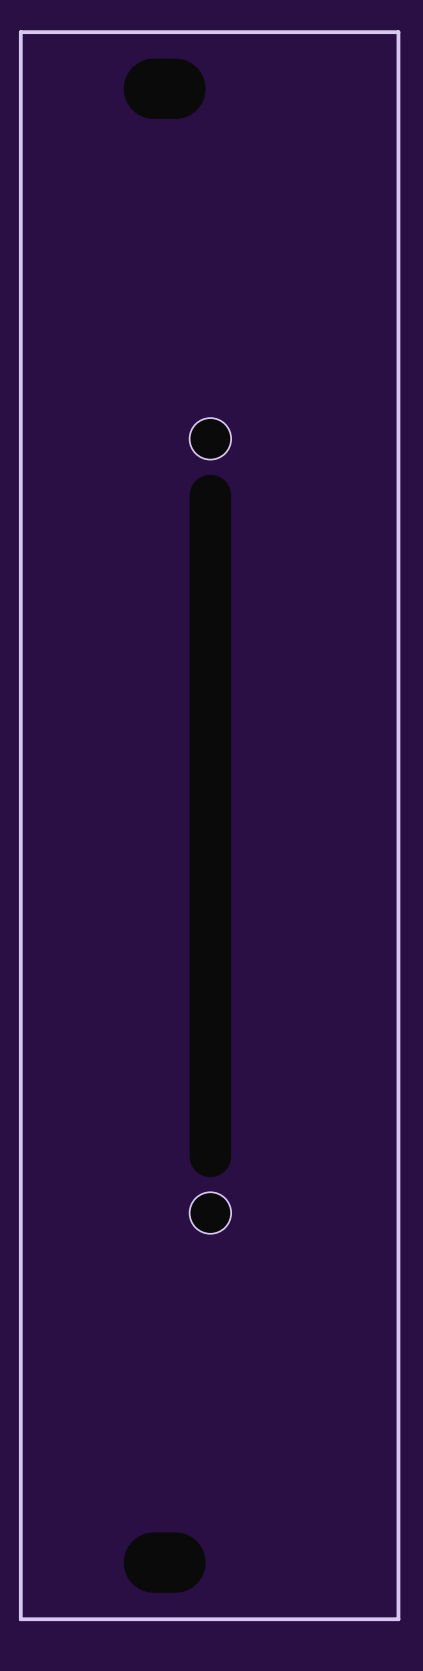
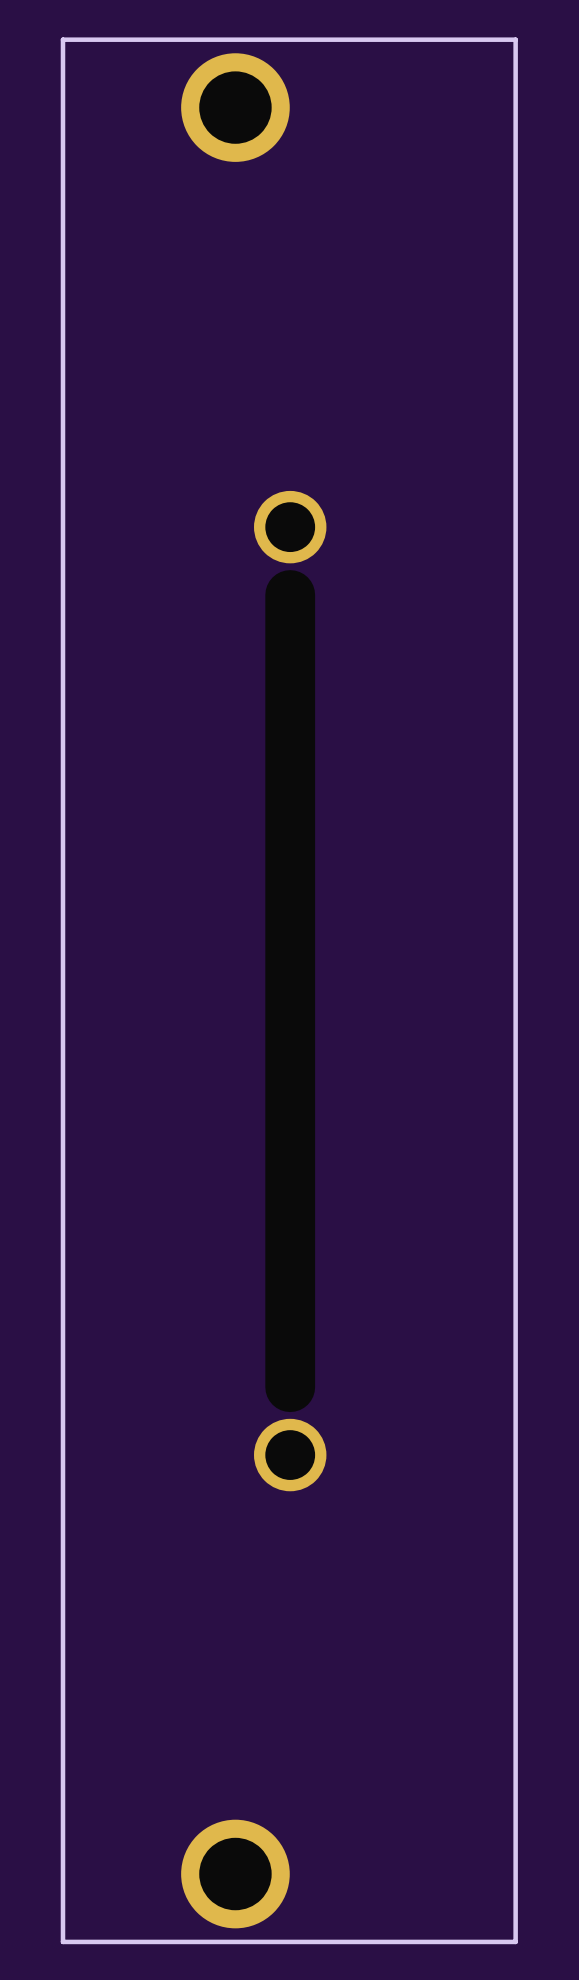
part footprint: [123, 58, 206, 120] -> [181, 53, 290, 162]
part footprint: [189, 418, 232, 1234] -> [254, 490, 327, 1492]
part footprint: [123, 1532, 206, 1593] -> [181, 1819, 290, 1929]

